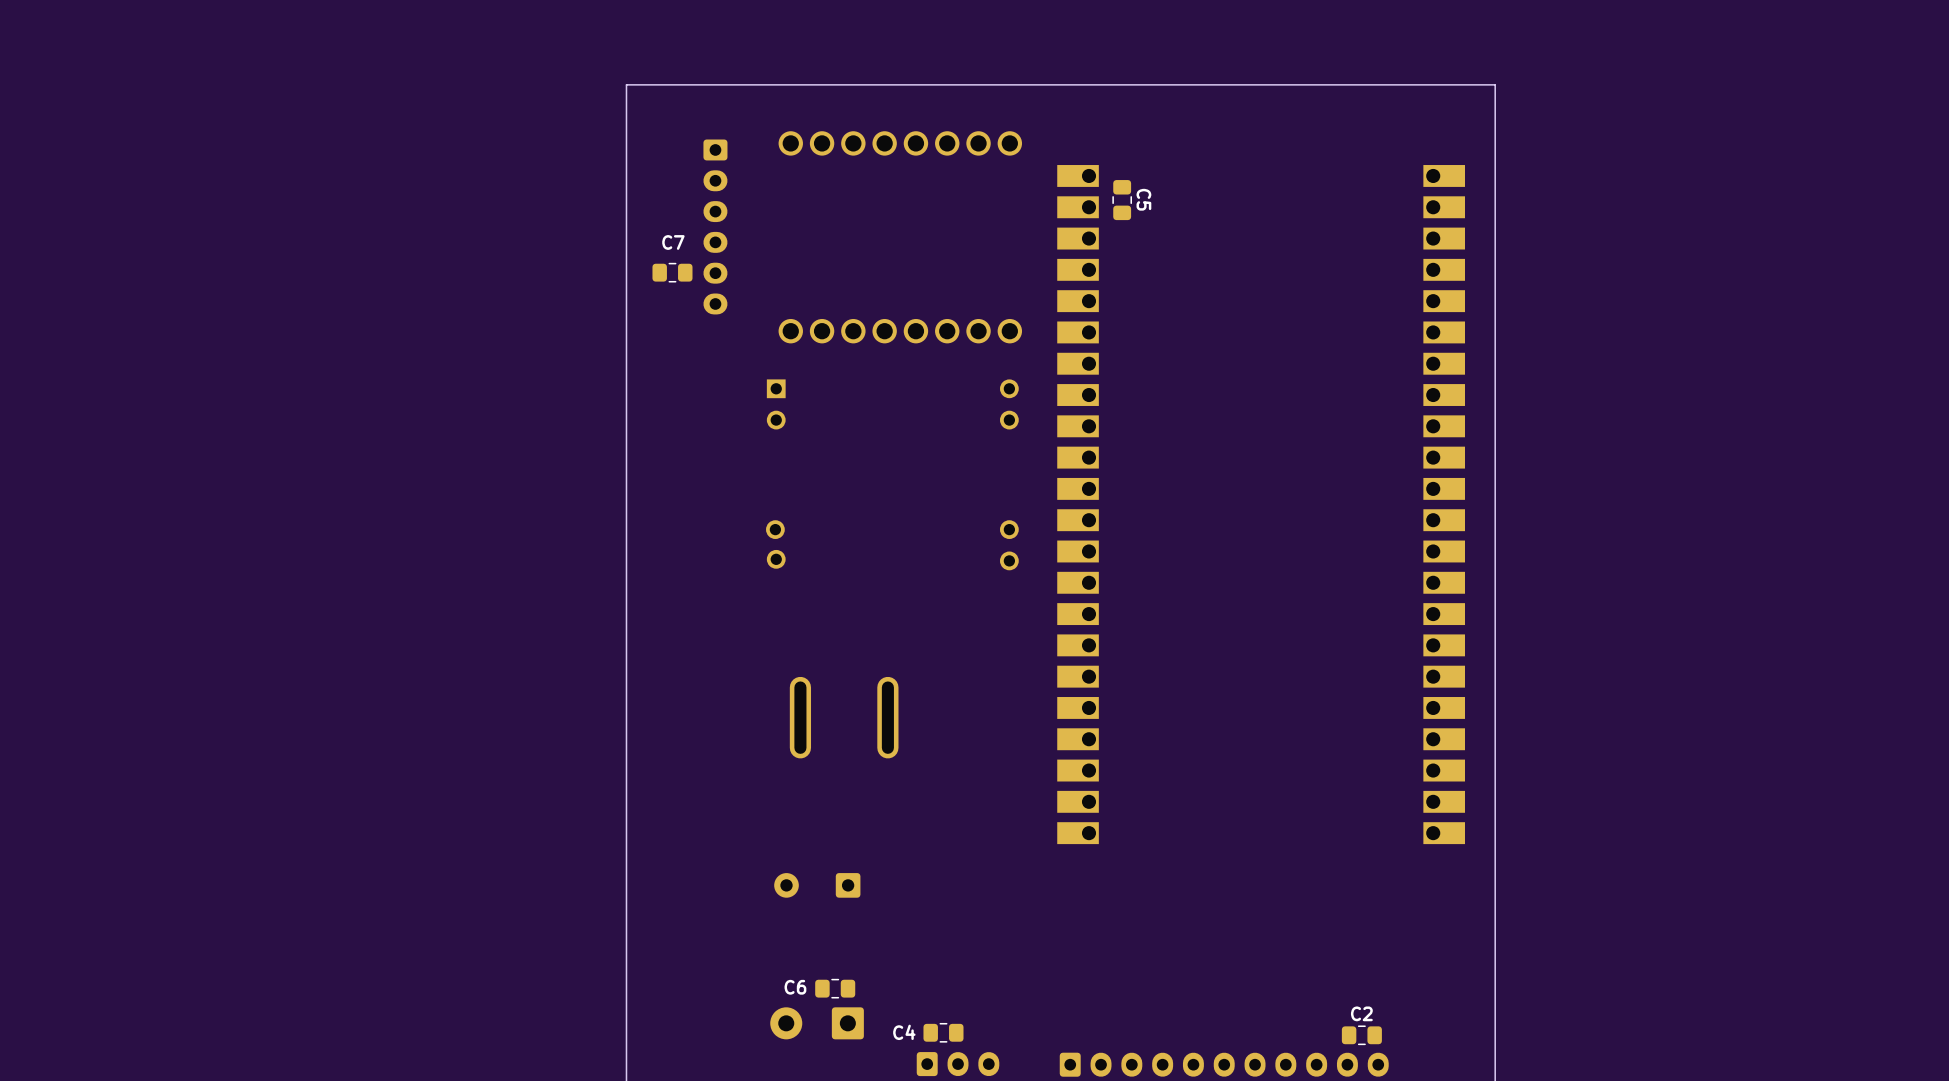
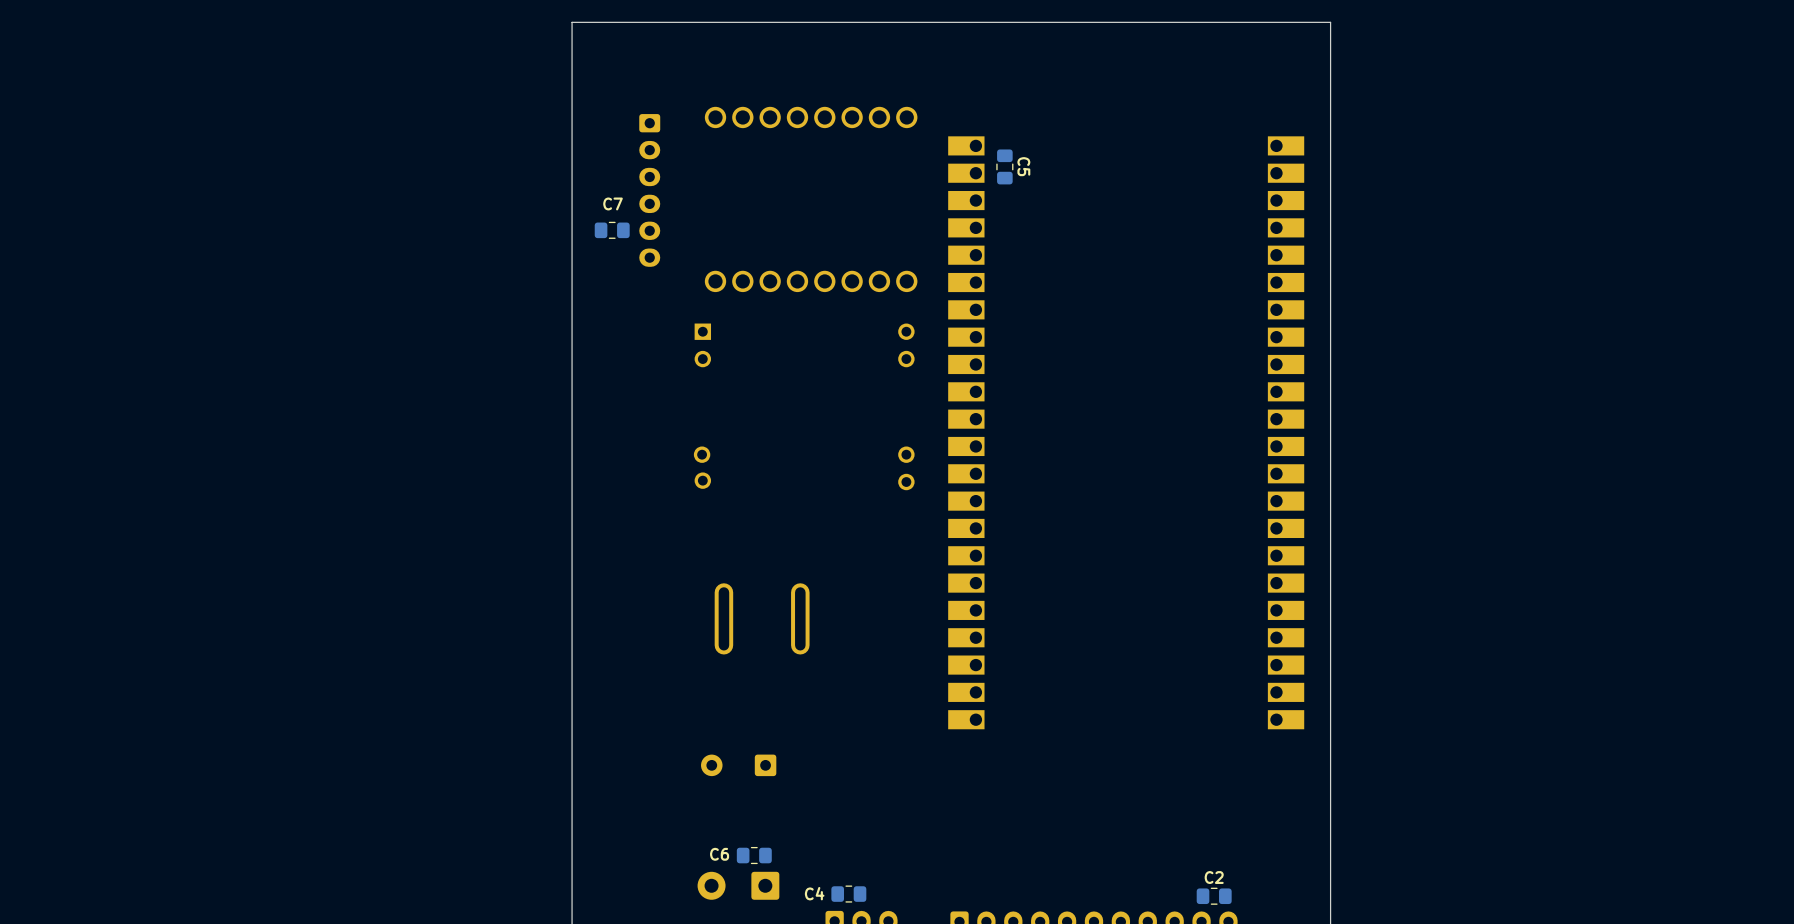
board edge: (1495, 84) (626, 84) -> (1330, 66) (1330, 22) (572, 22) (572, 66)

